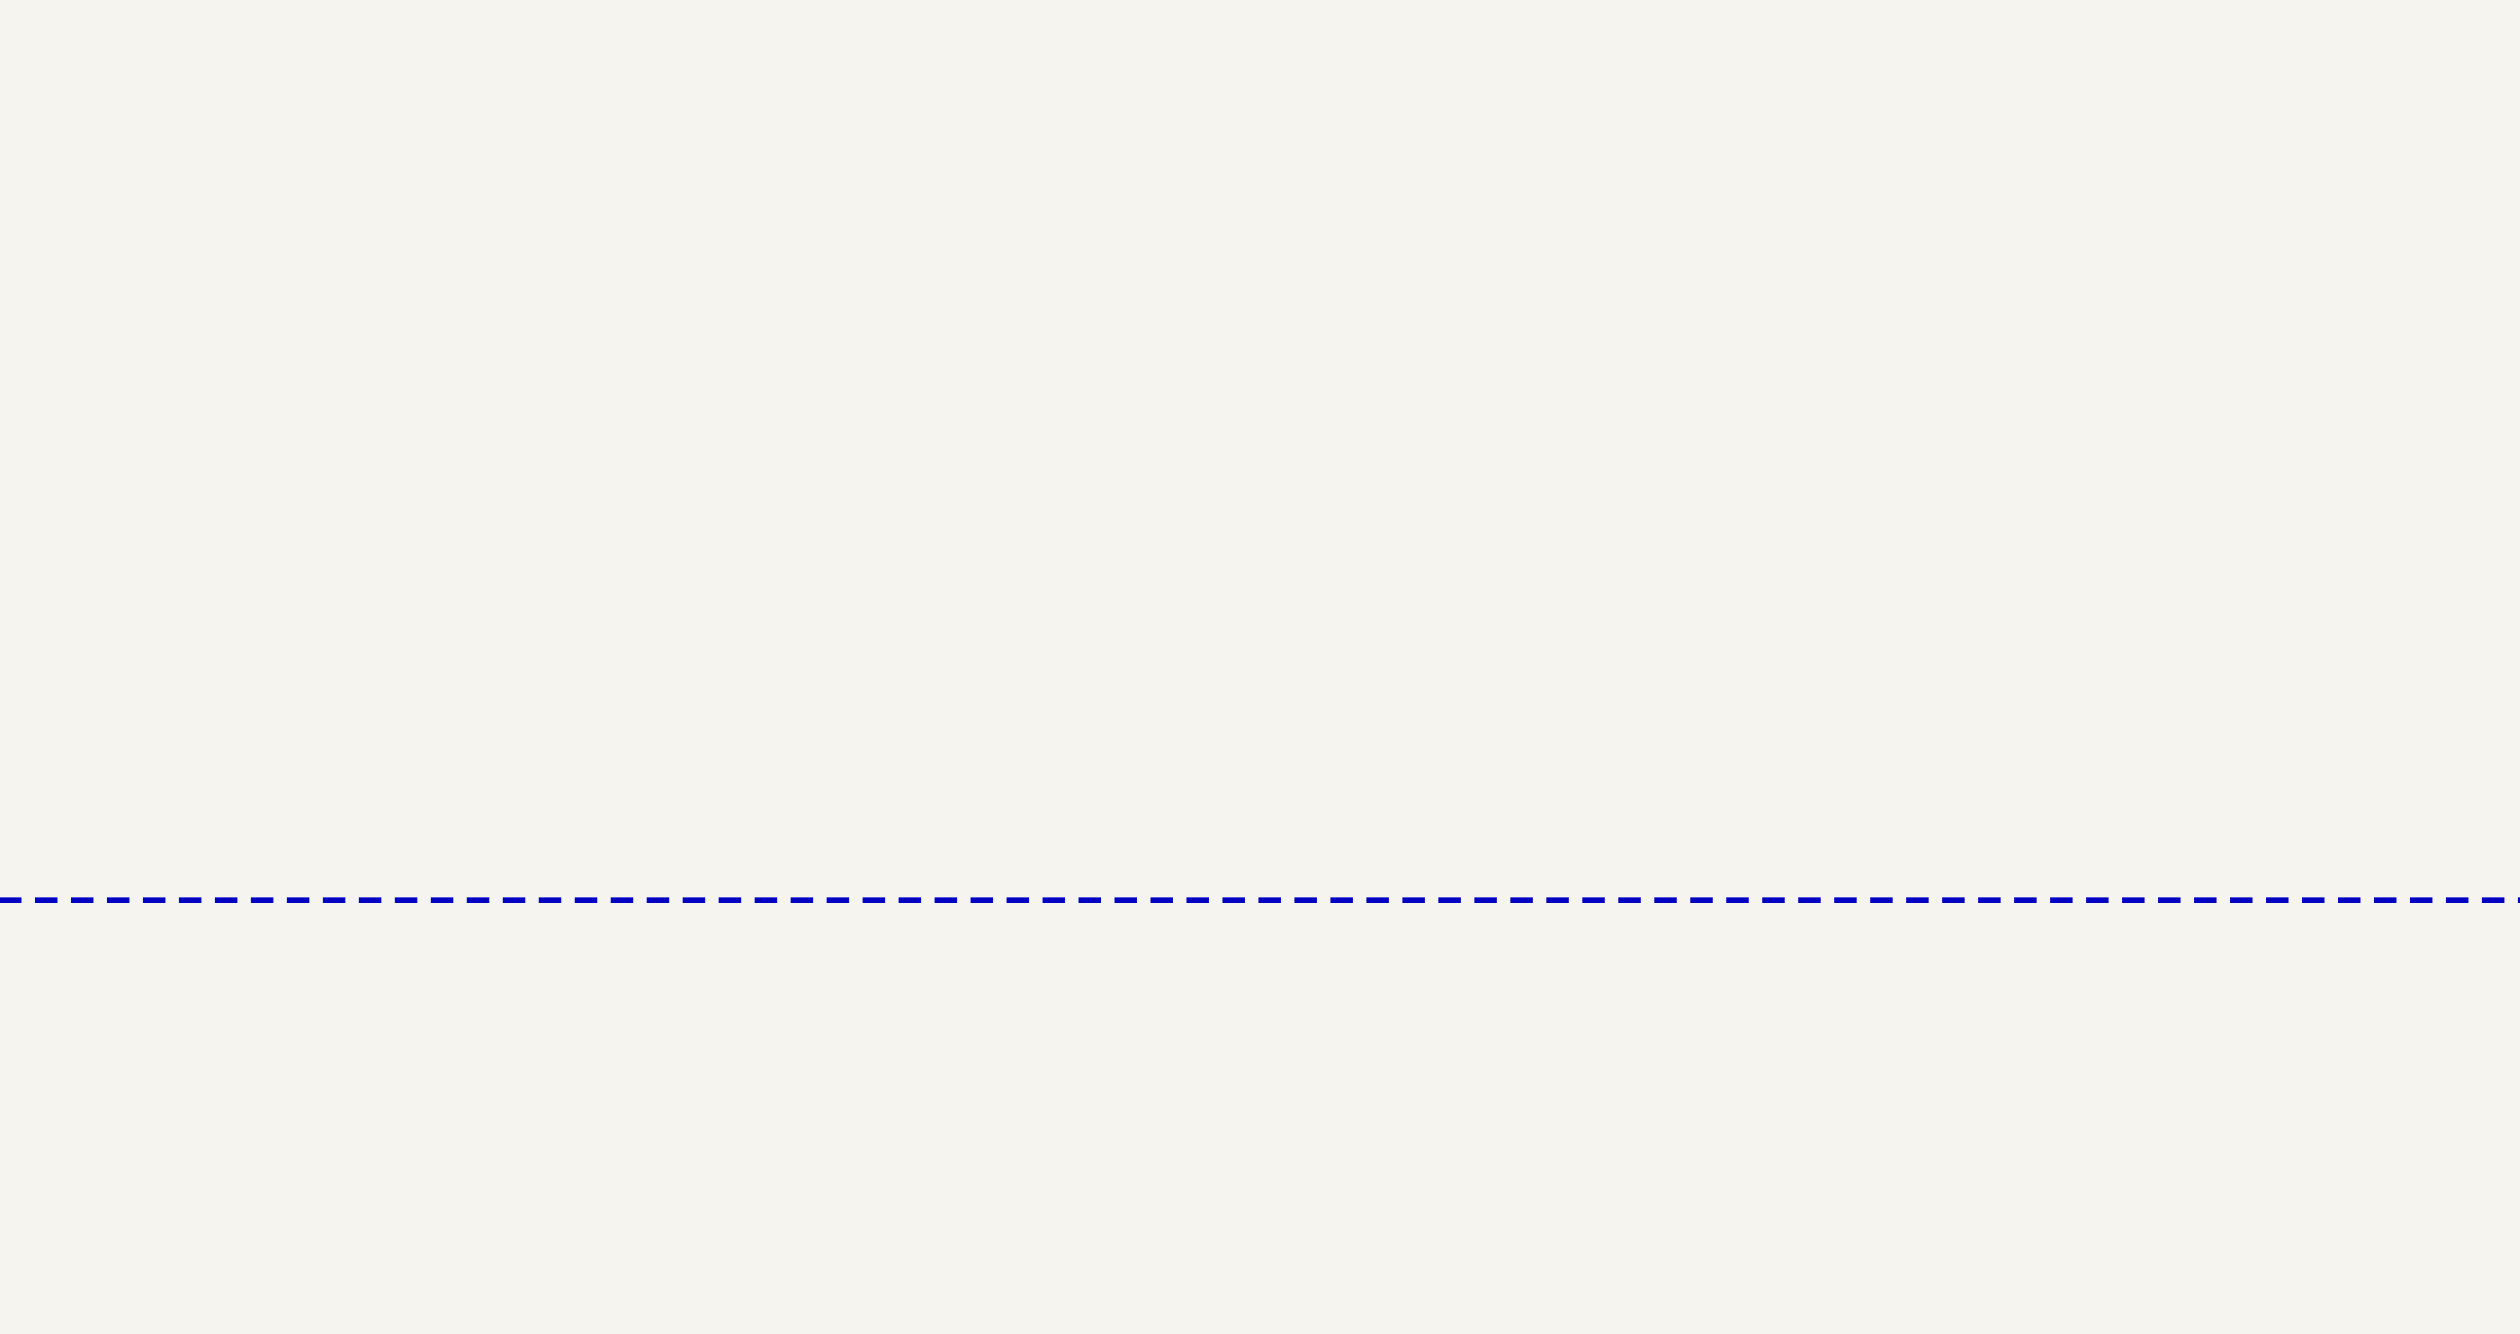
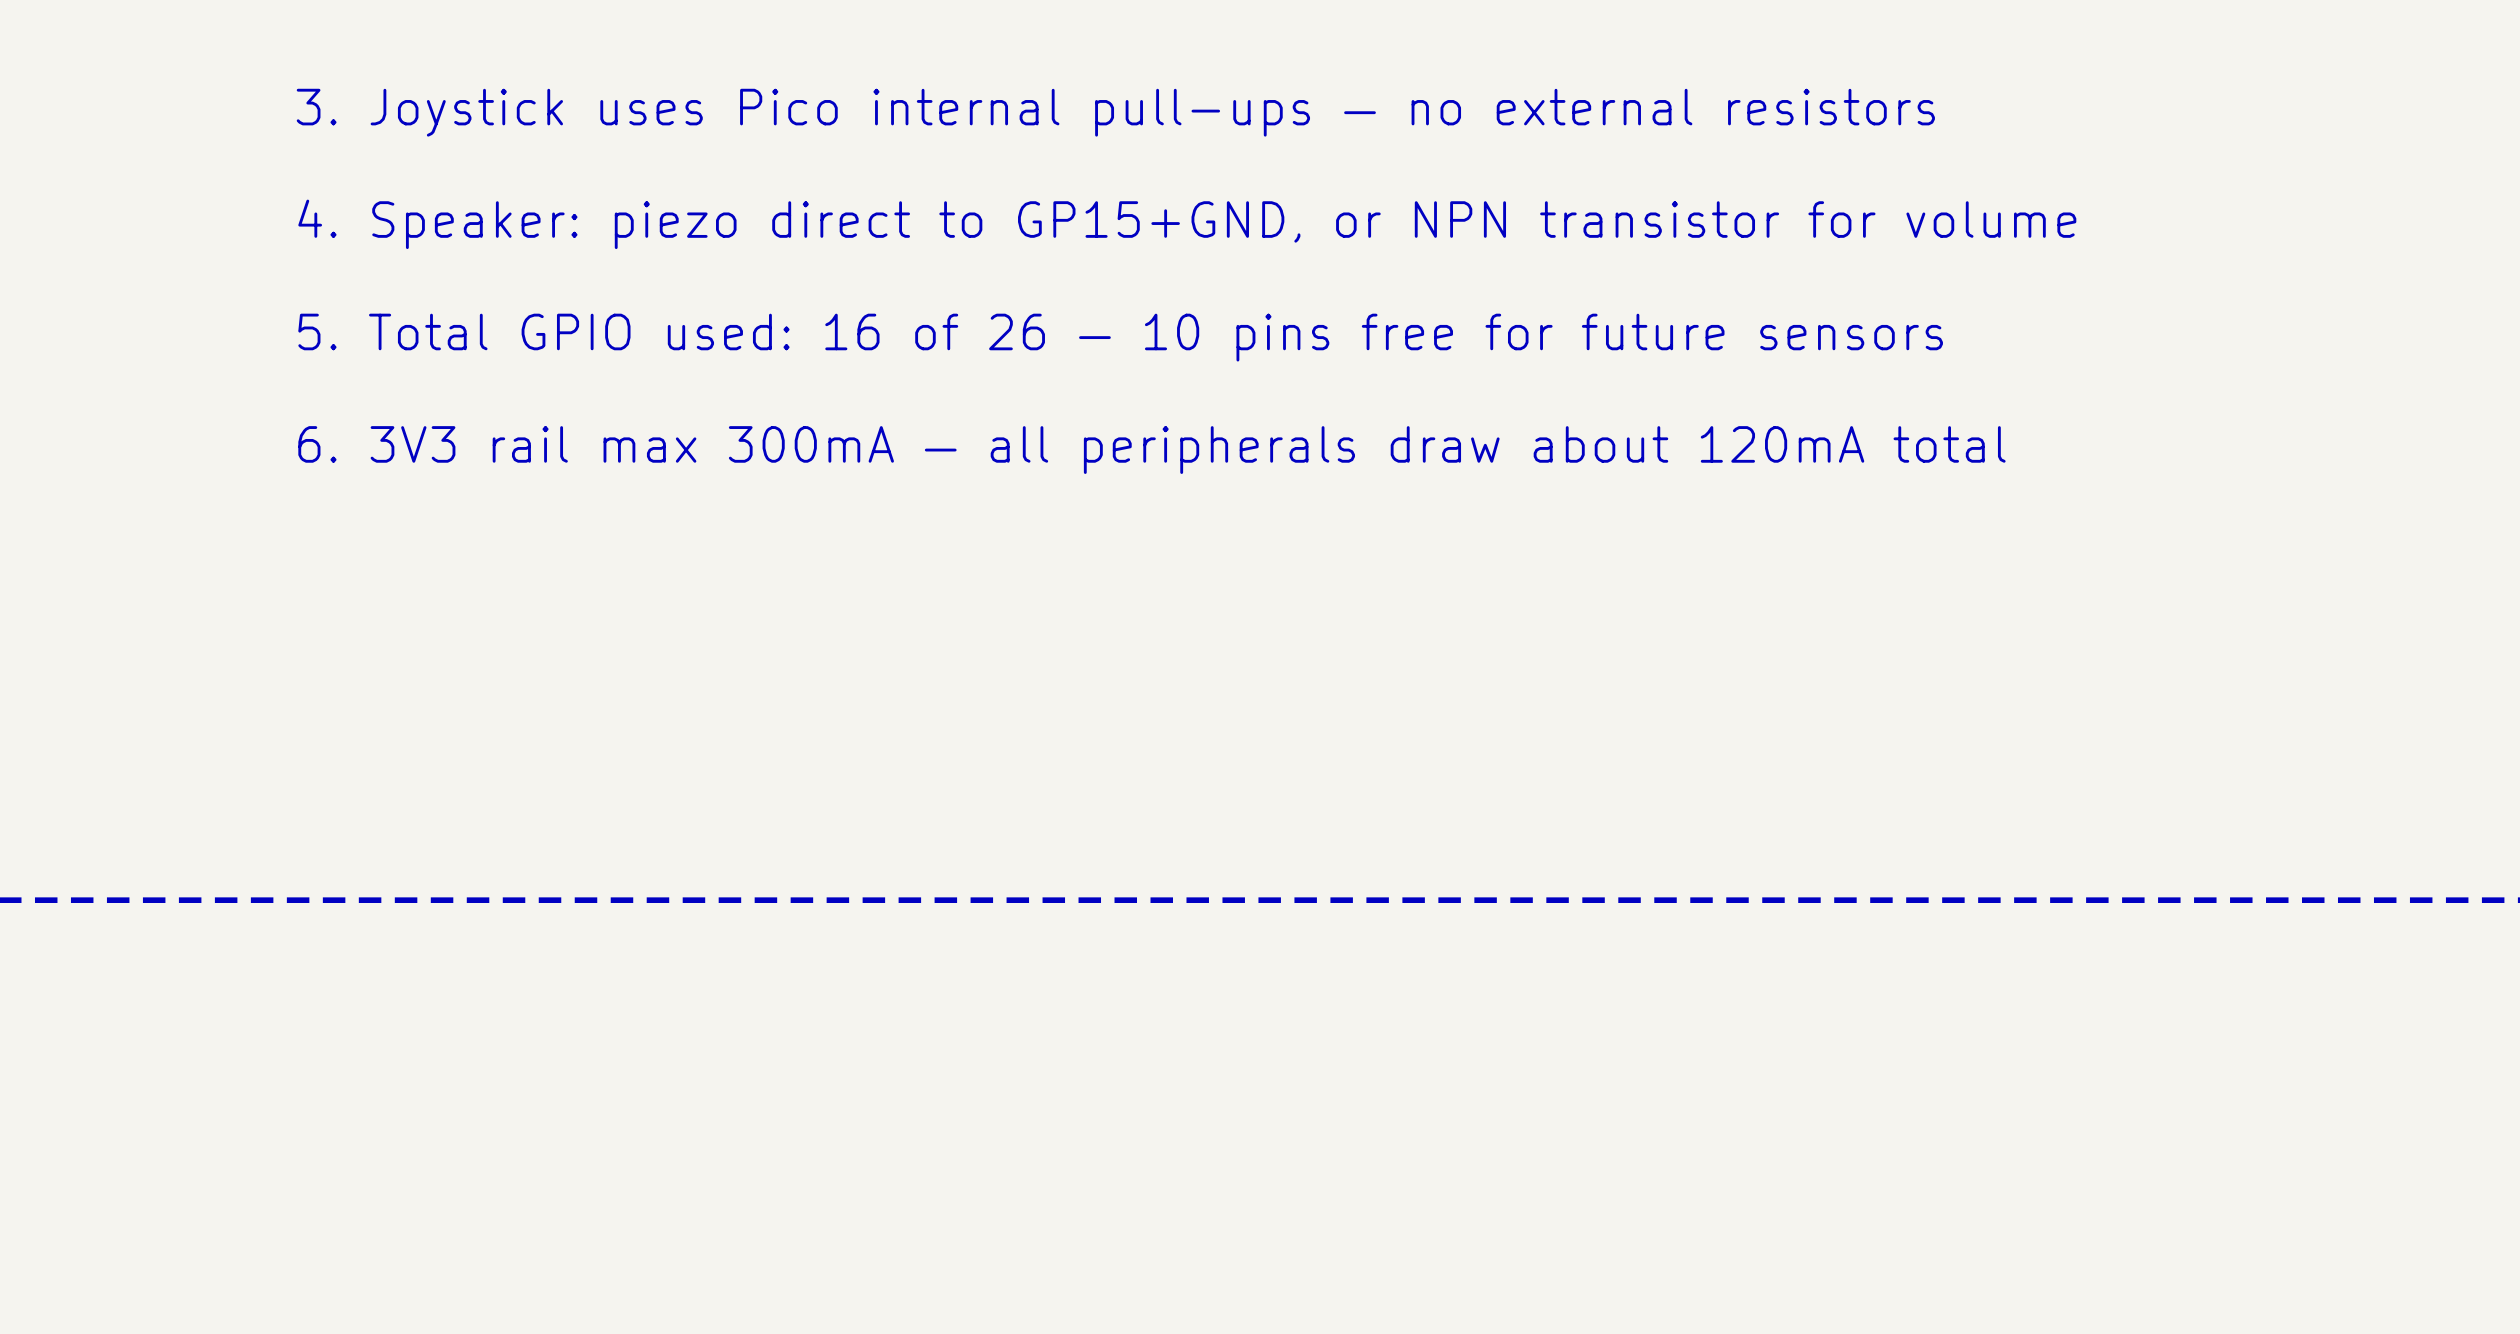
text: none -> 3. Joystick uses Pico internal pull-ups — no external resistors (1115, 112)
text: none -> 4. Speaker: piezo direct to GP15+GND, or NPN transistor for volume (1187, 224)
text: none -> 5. Total GPIO used: 16 of 26 — 10 pins free for future sensors (1120, 337)
text: none -> 6. 3V3 rail max 300mA — all peripherals draw about 120mA total (1151, 450)

